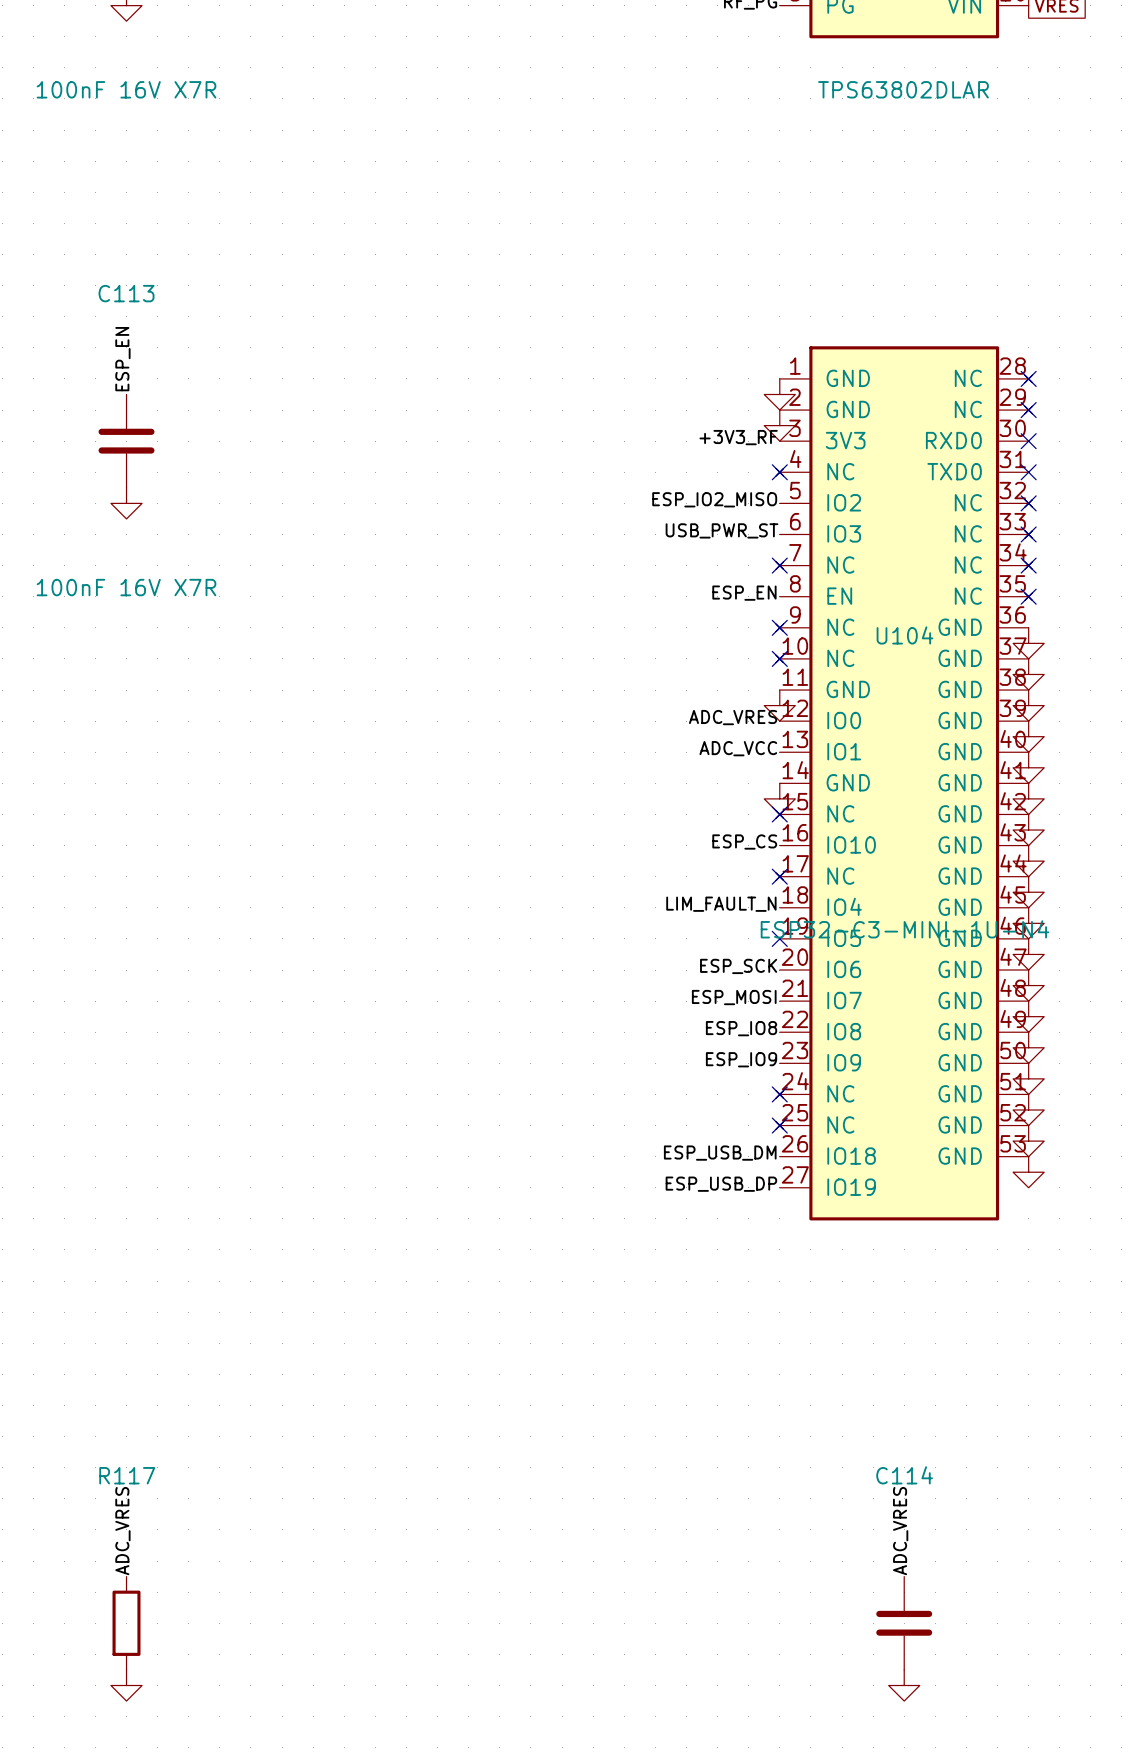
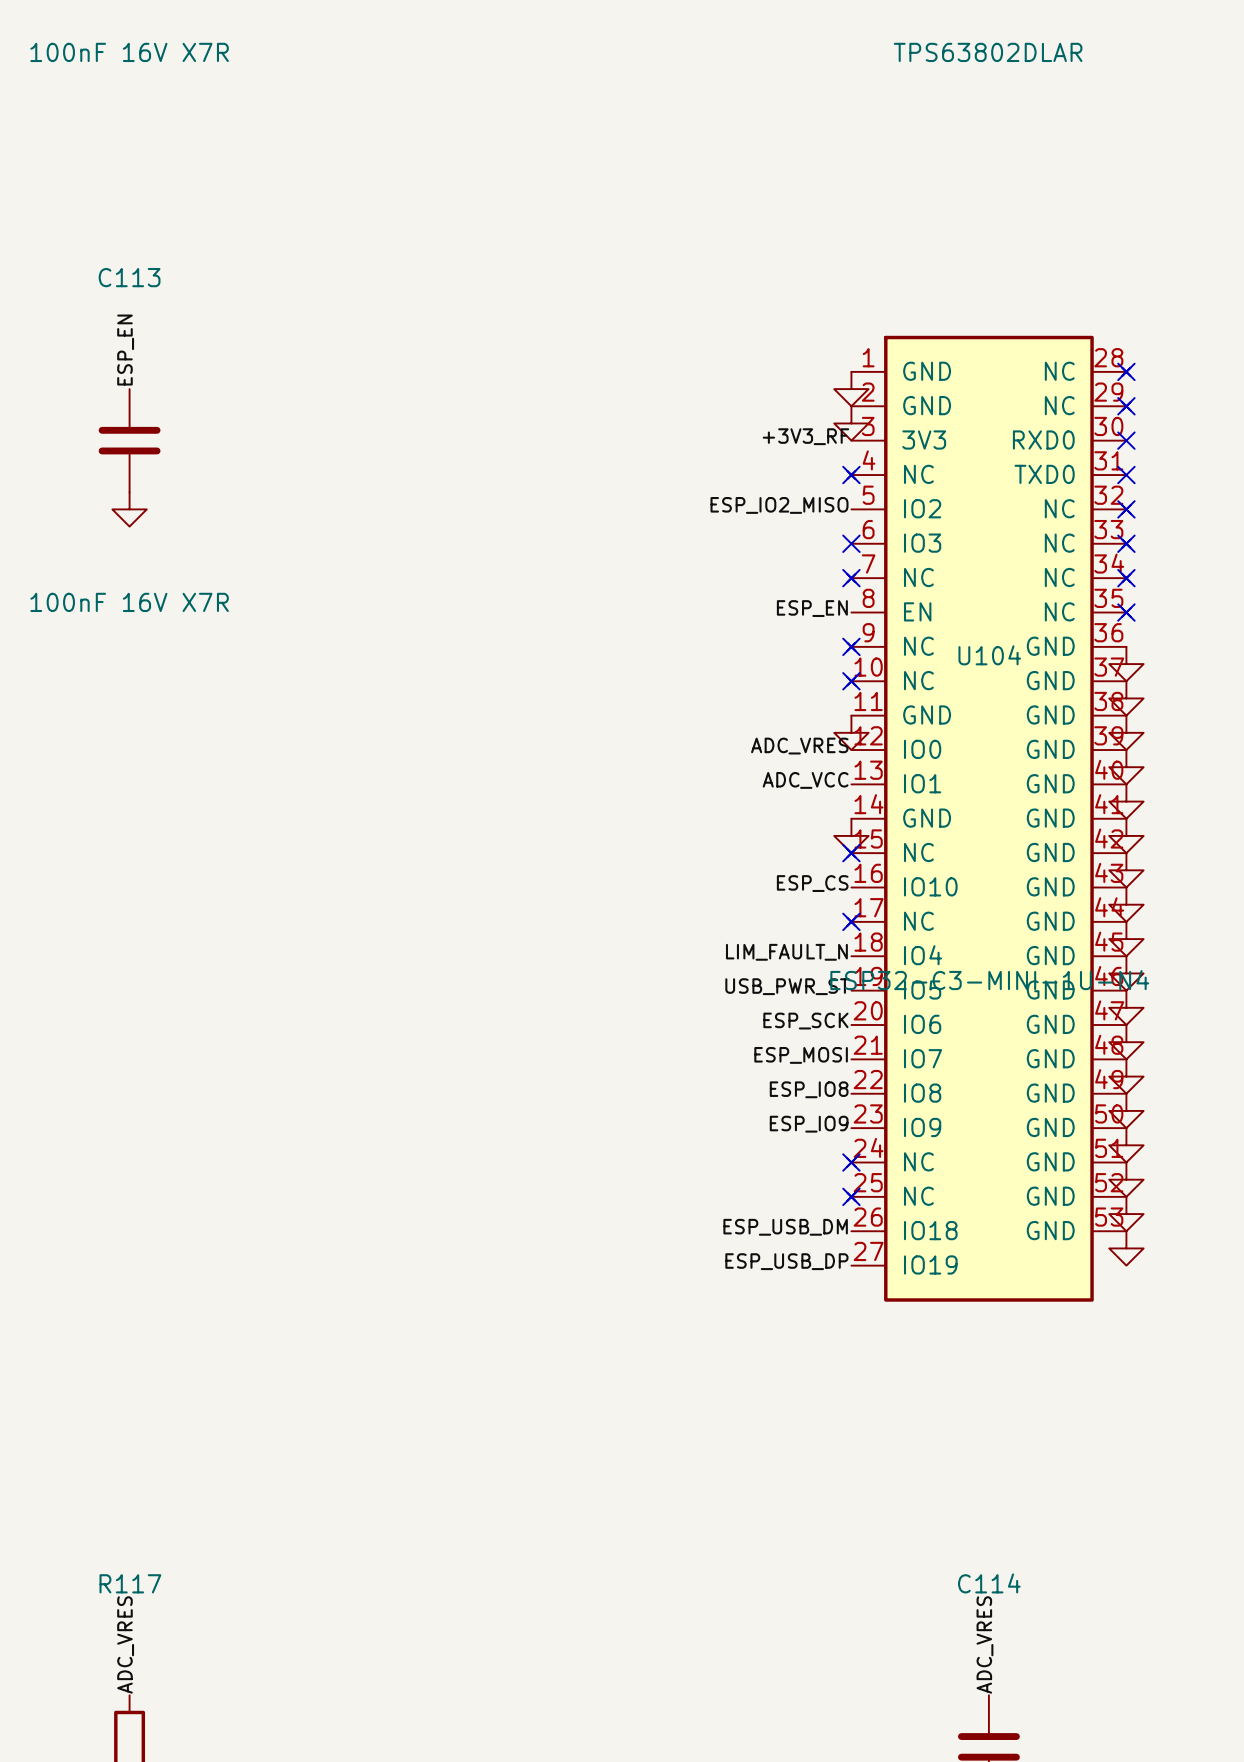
label: USB_PWR_ST (721, 530) -> none
no-connect mark: none -> (851, 543)
label: none -> USB_PWR_ST (787, 986)
no-connect mark: (779, 938) -> none

